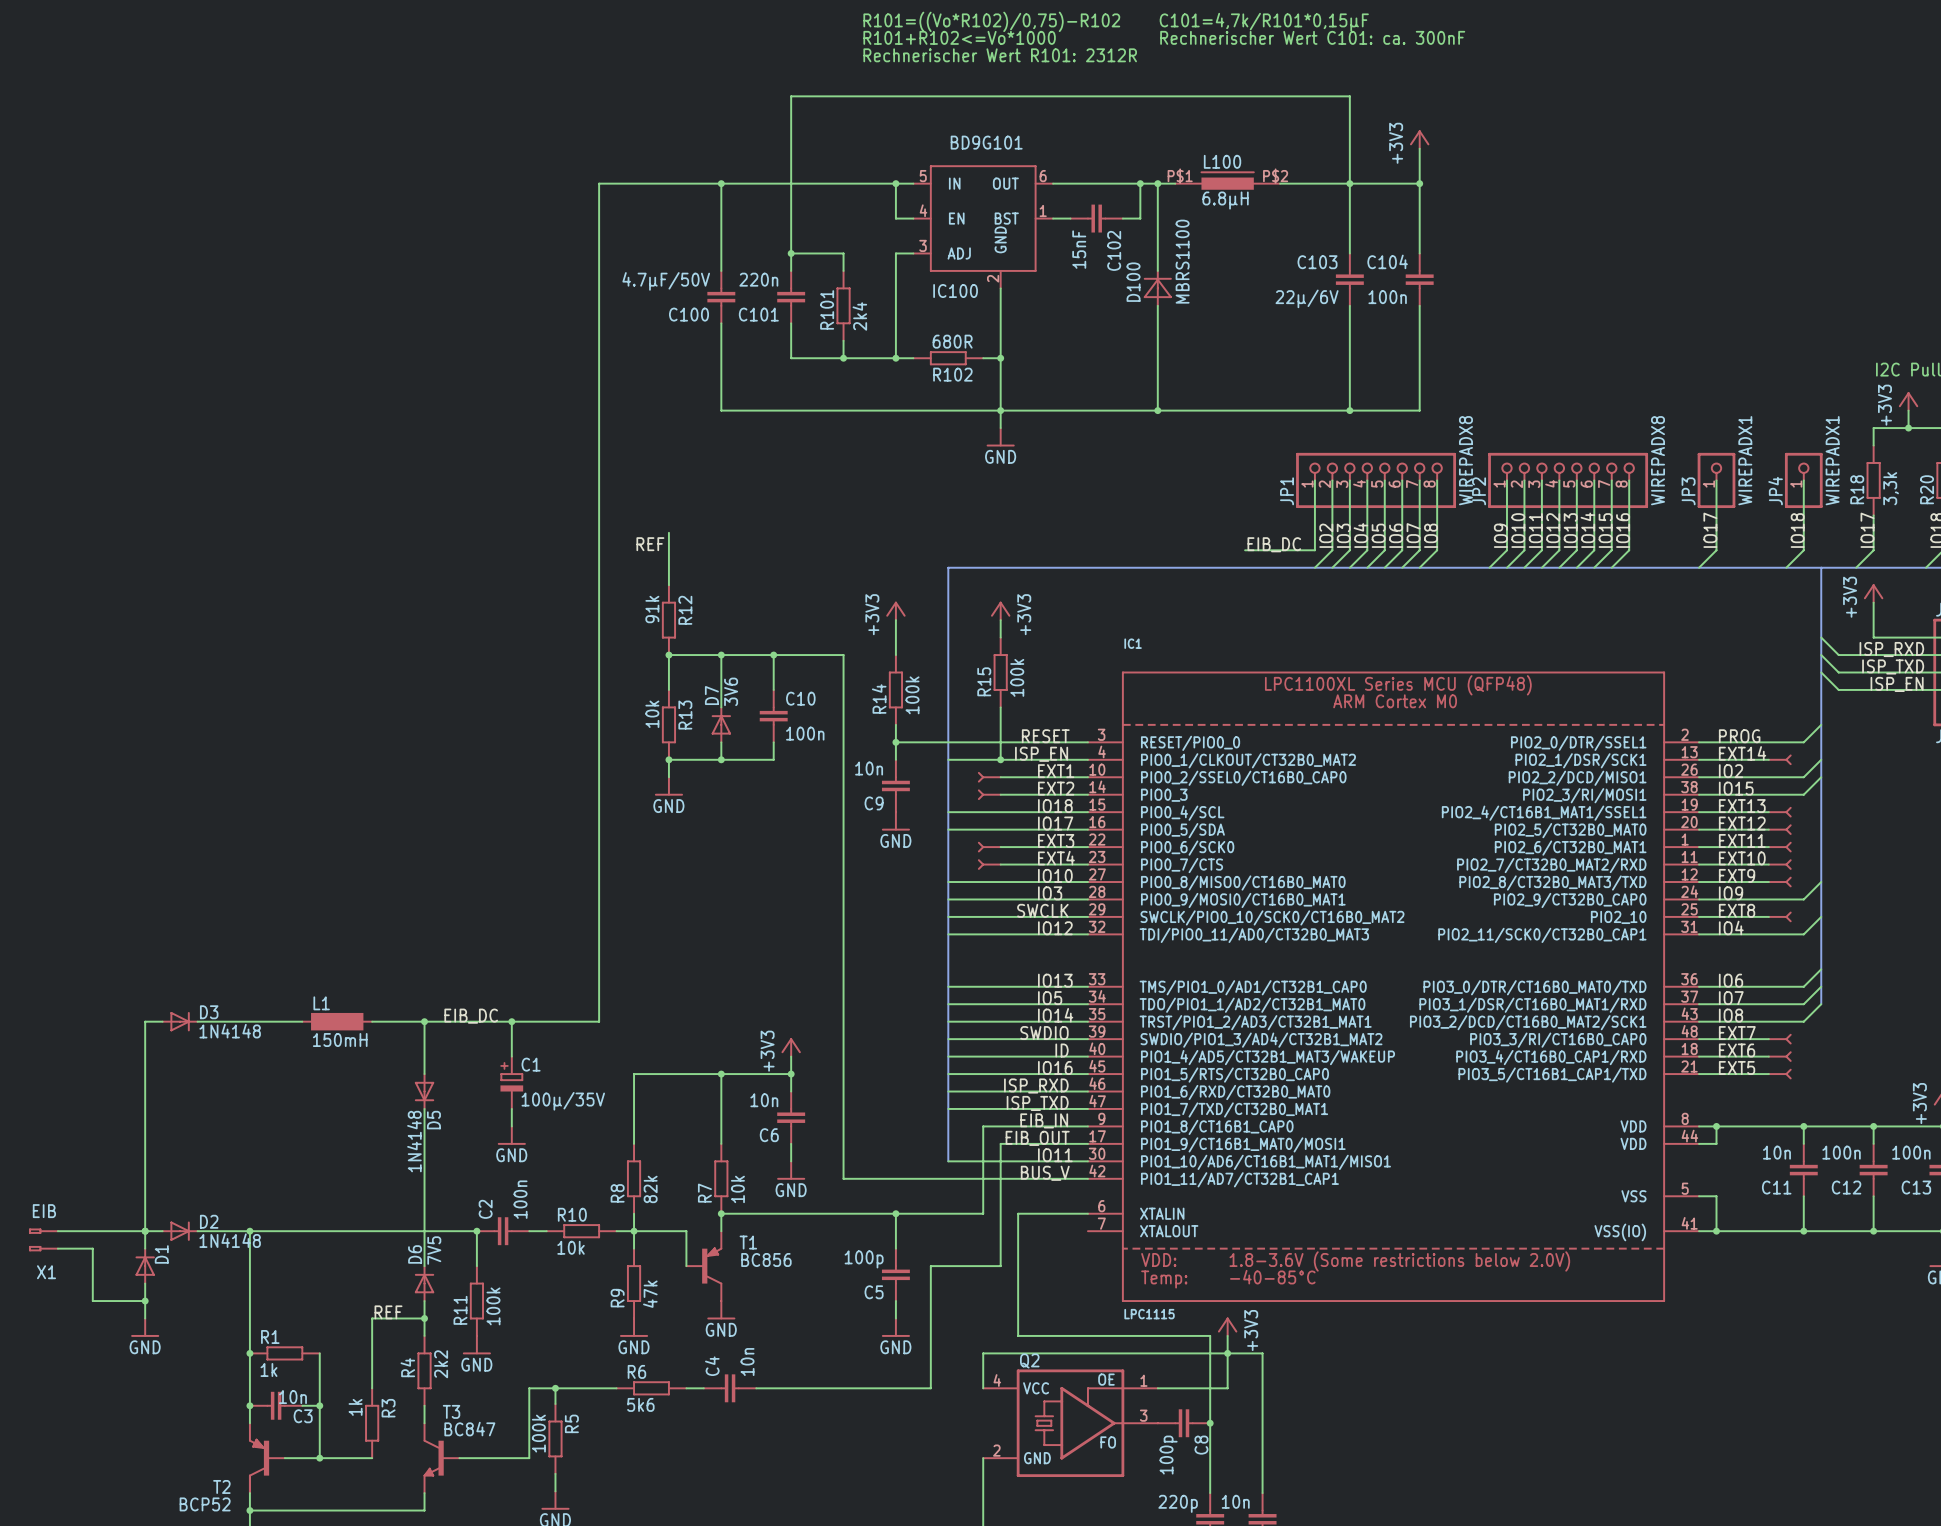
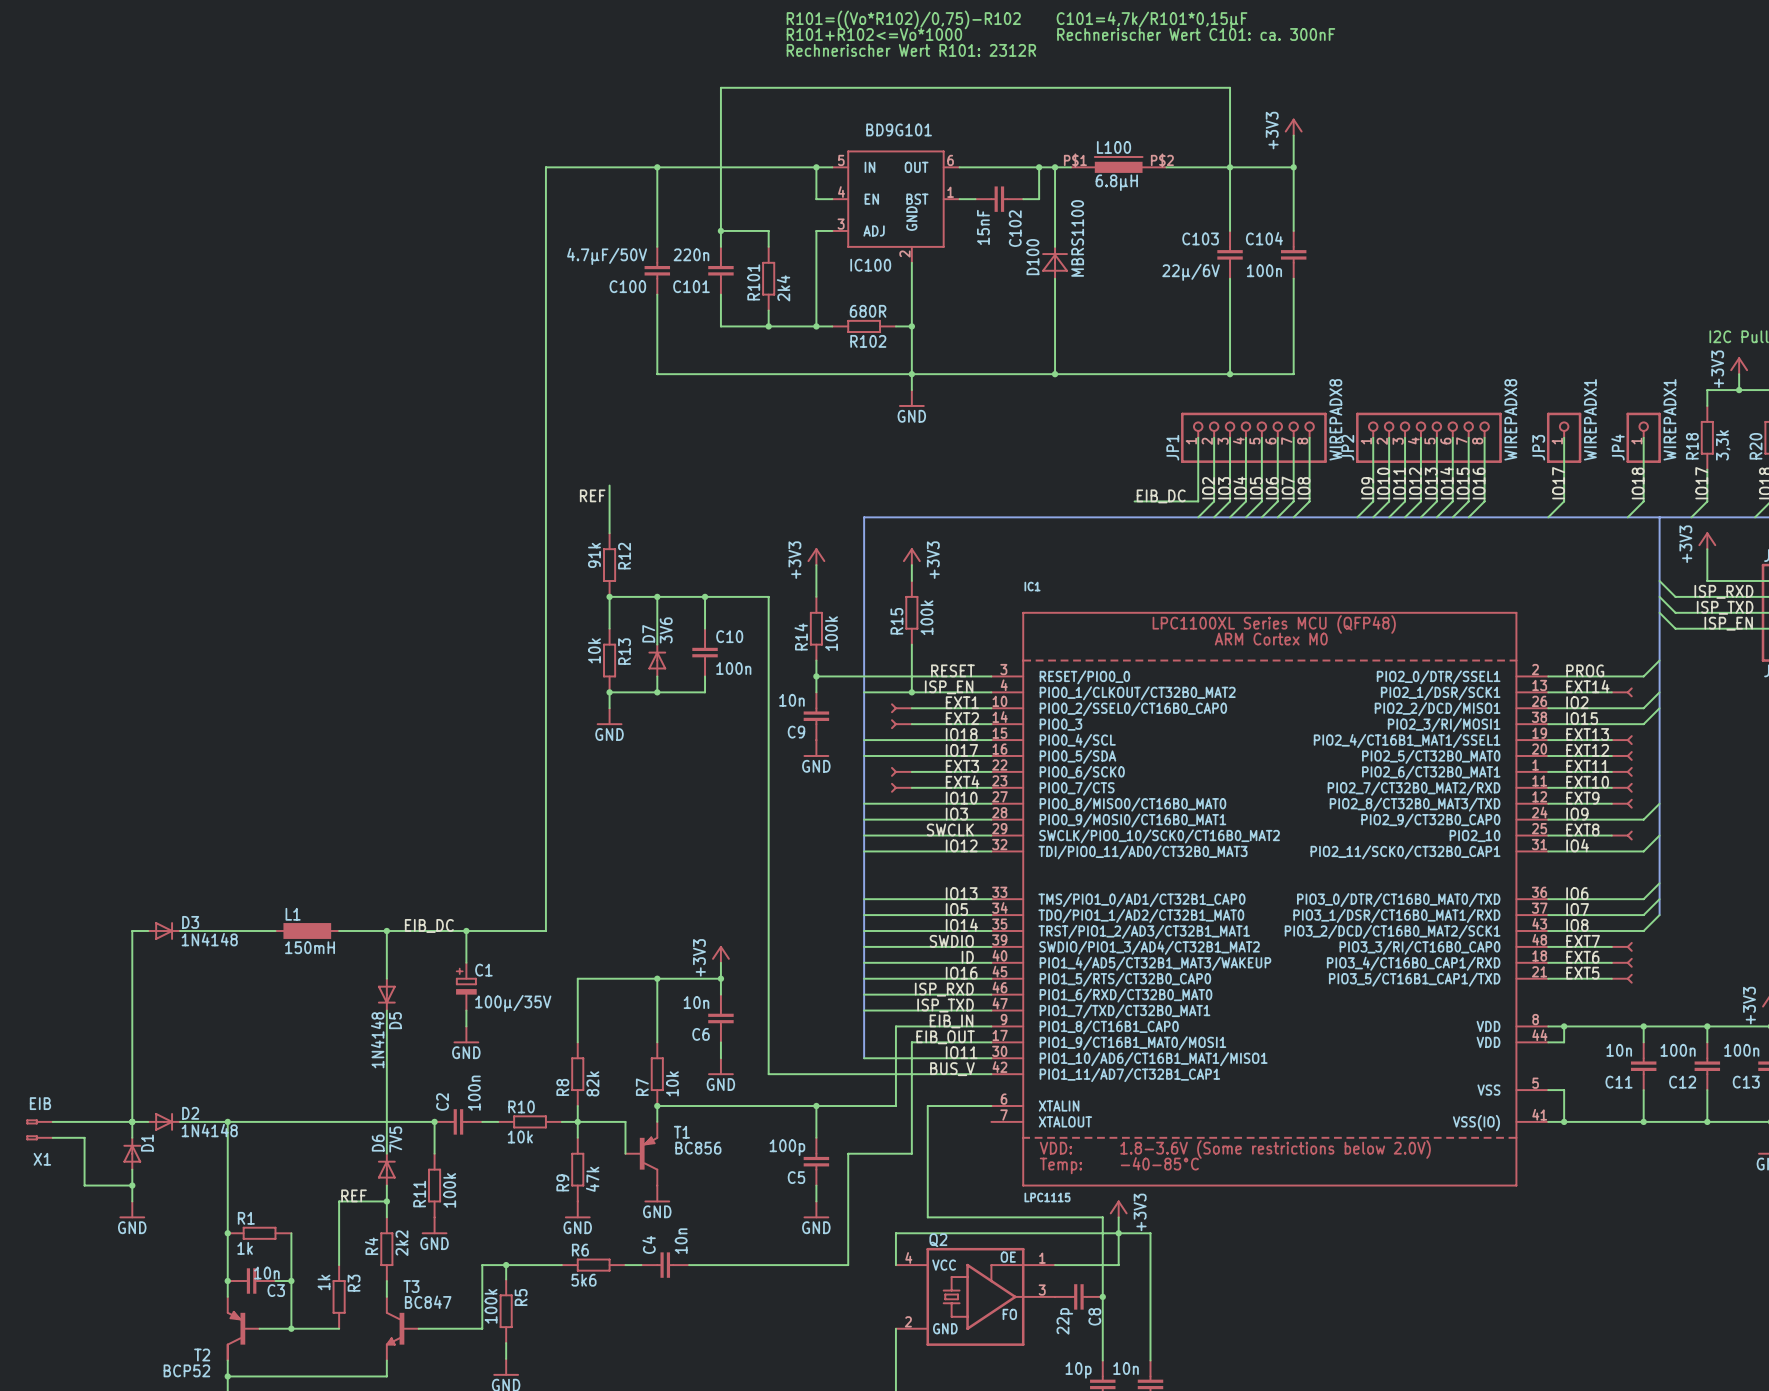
C8 value: 100p (1168, 1455) -> 22p (1064, 1321)
part value: 220p (1178, 1503) -> 10p (1078, 1370)

